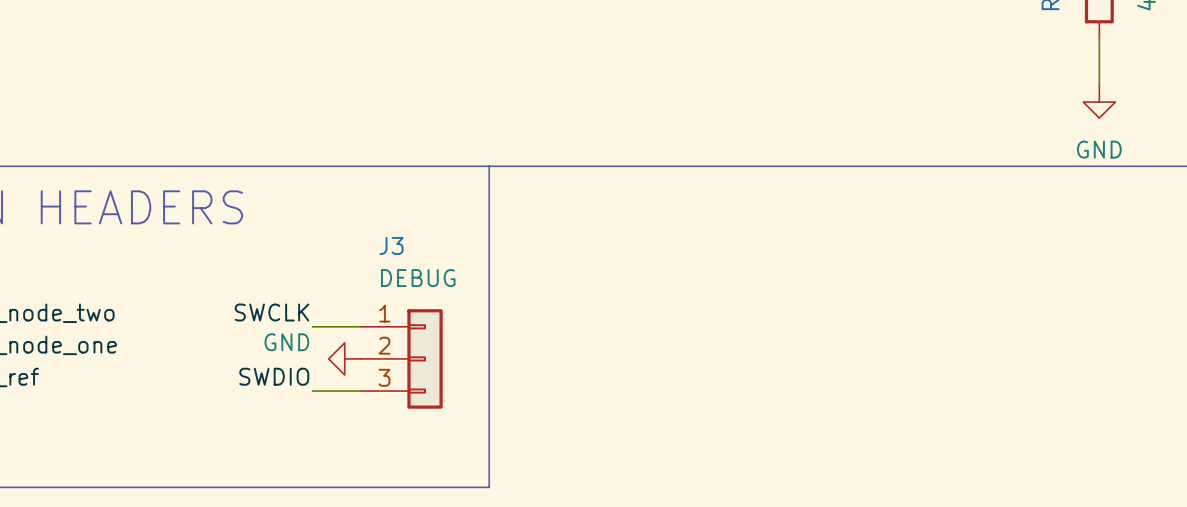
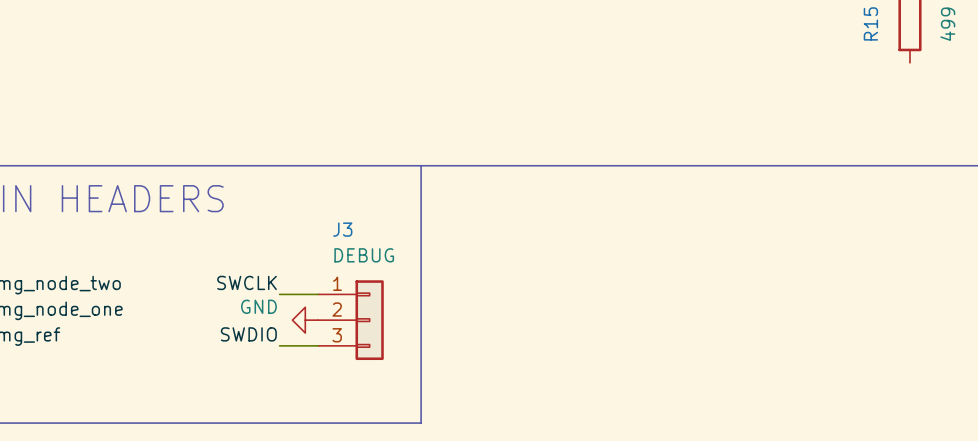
wire: (1099, 37) (1099, 85) -> none
power symbol: GND (1099, 102) -> none

